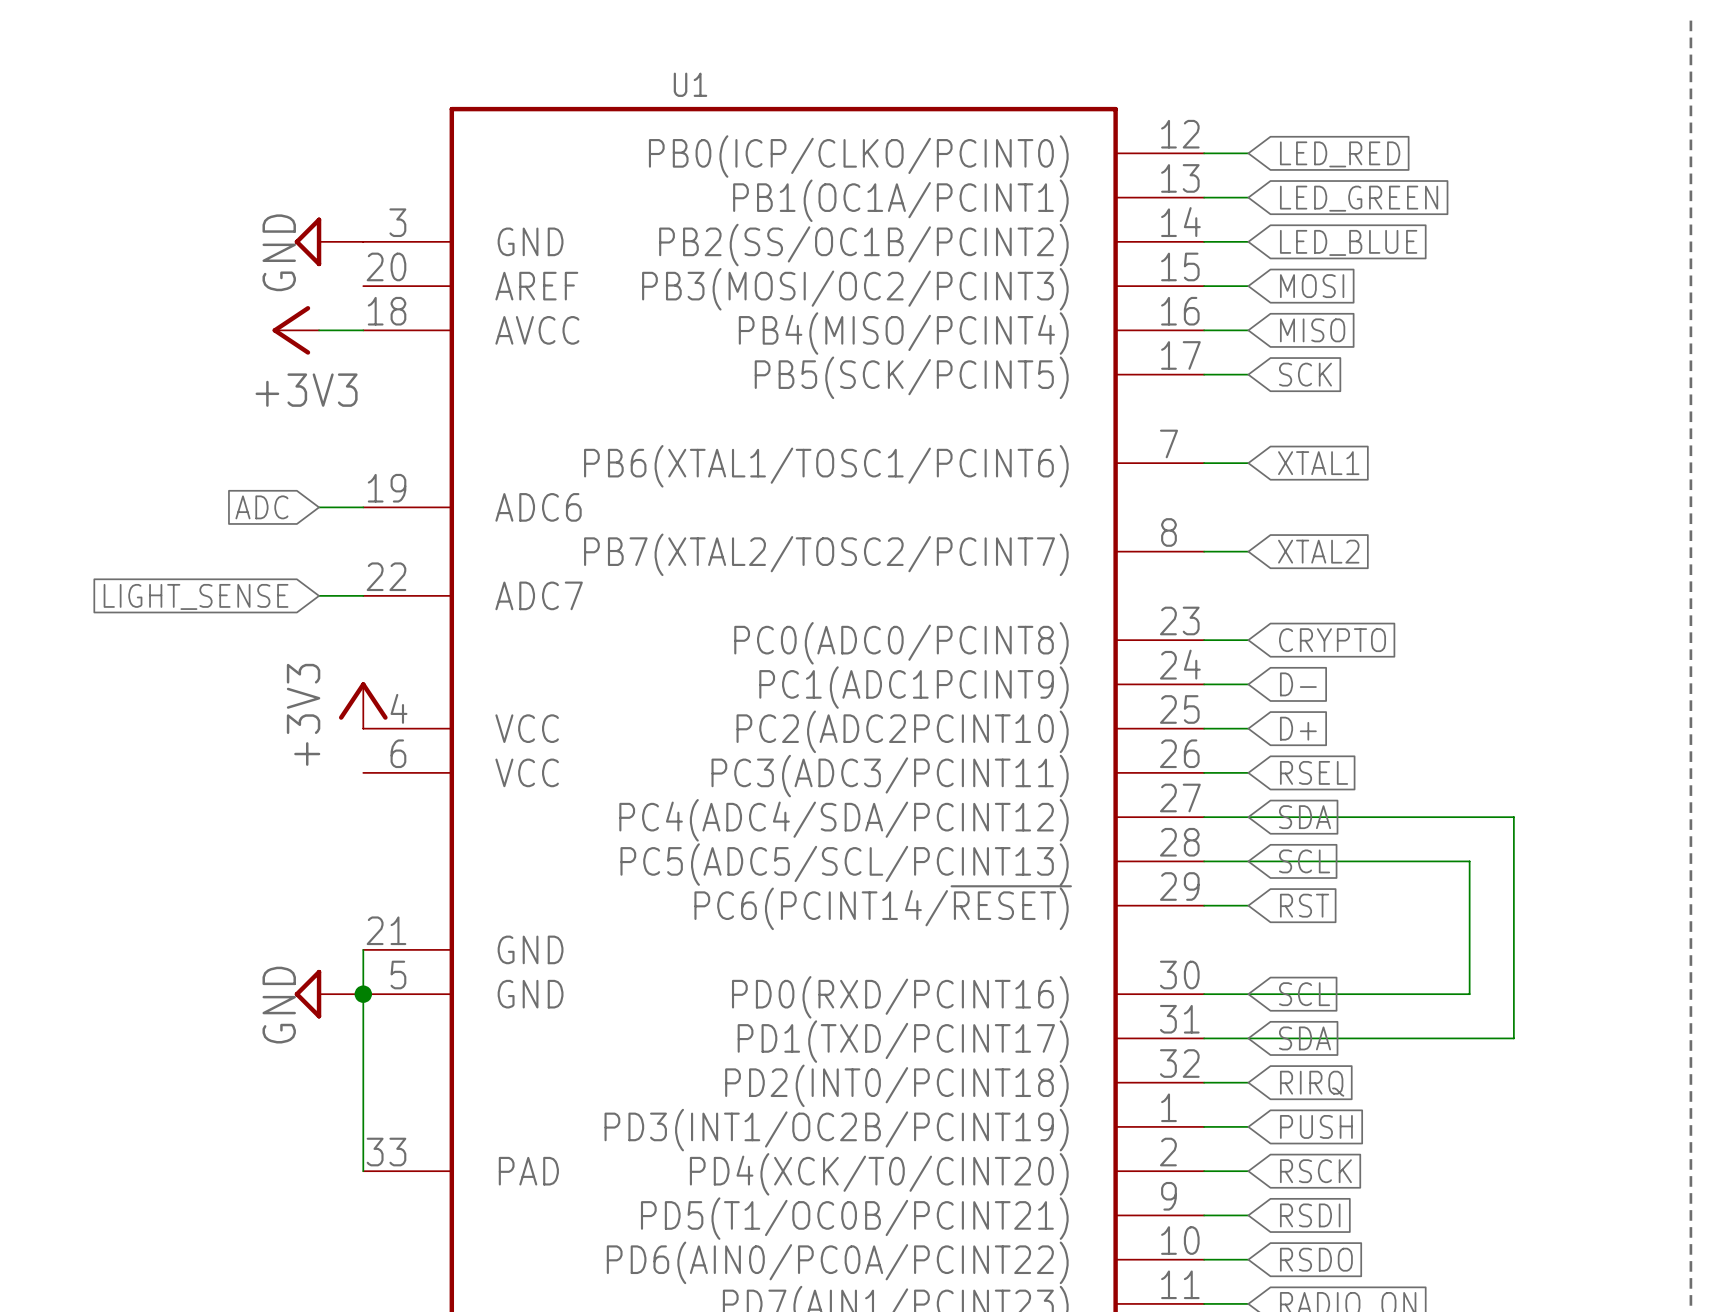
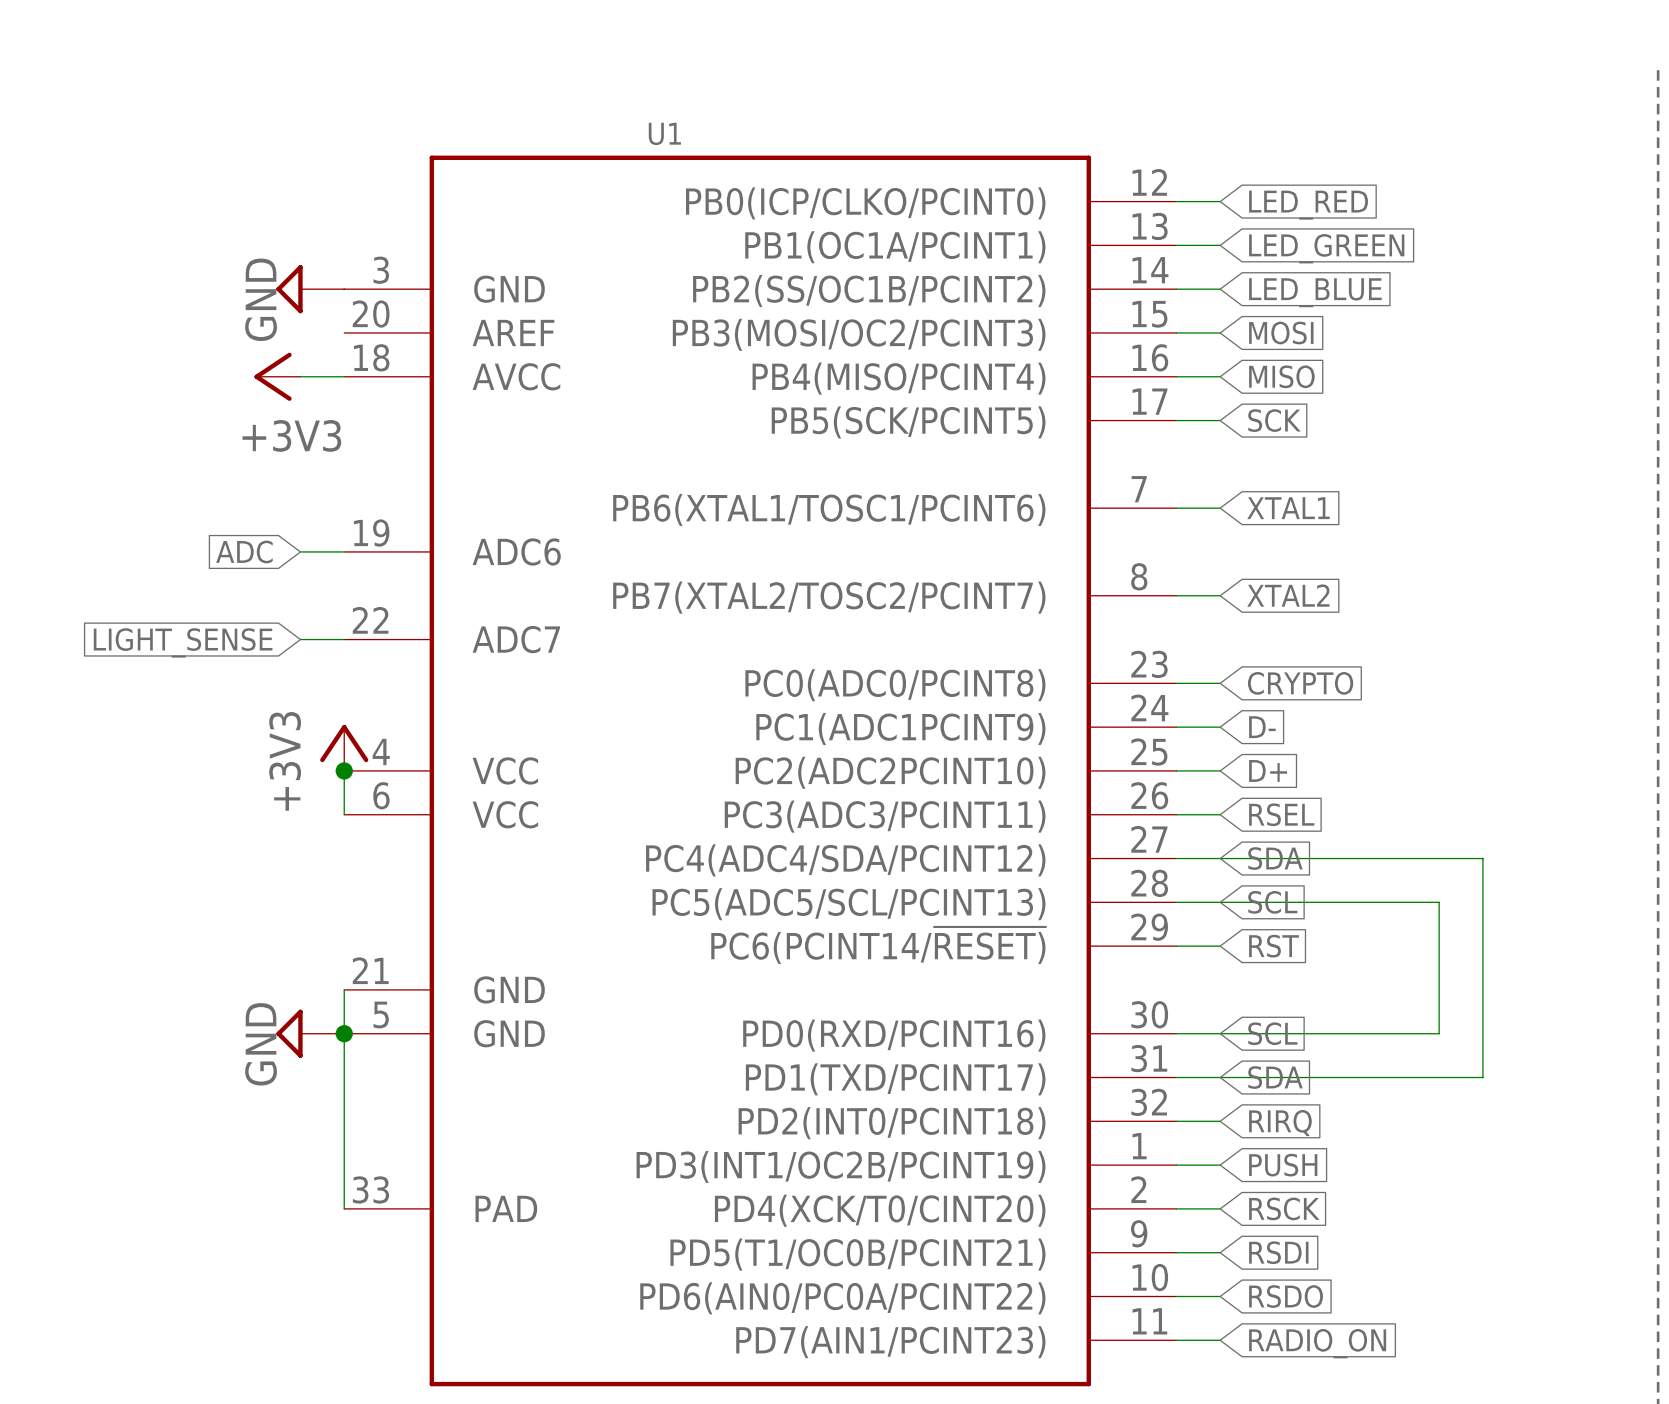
wire: none -> (344, 770) (344, 814)
junction: none -> (344, 770)

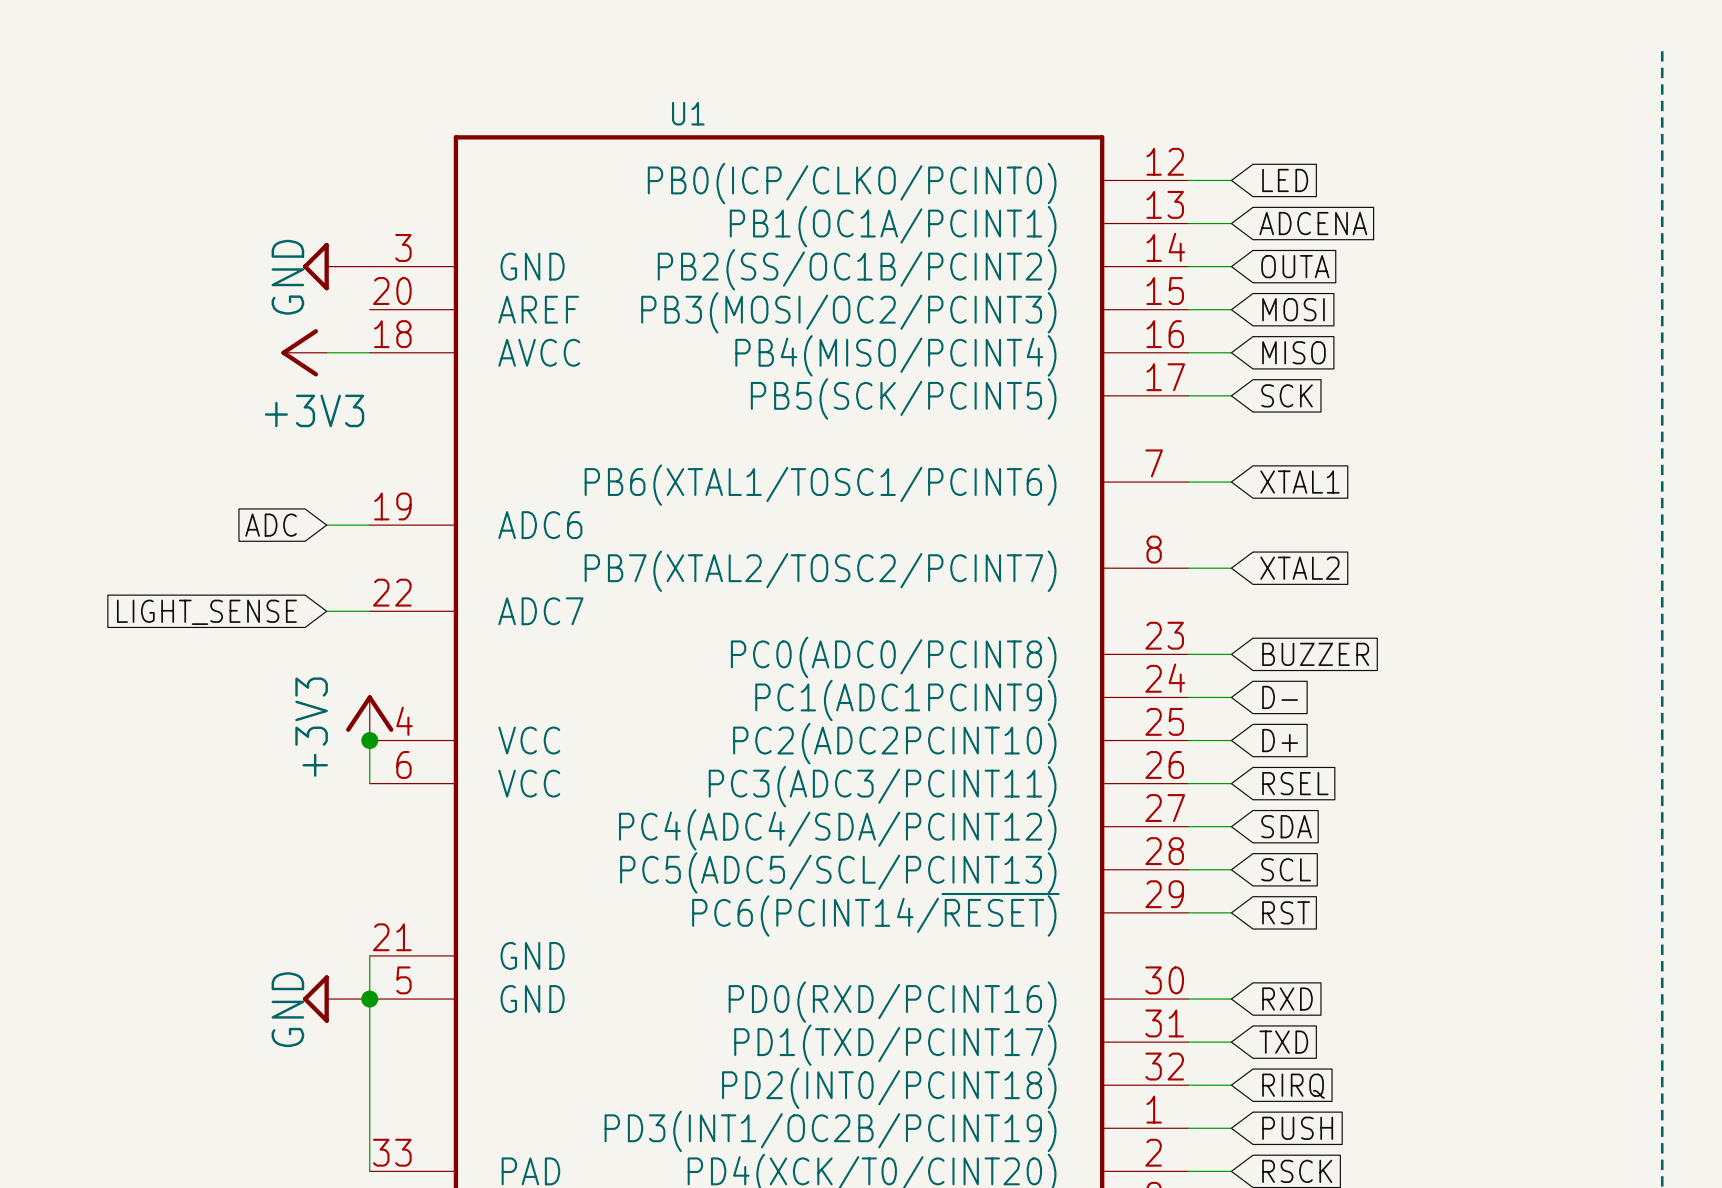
global label: LED_RED (1308, 205) -> LED (1285, 180)
global label: LED_GREEN (1326, 248) -> ADCENA (1313, 223)
global label: LED_BLUE (1315, 292) -> OUTA (1295, 266)
global label: CRYPTO (1300, 683) -> BUZZER (1315, 654)
wire: (1220, 858) (1482, 858) (1482, 1077) (1220, 1077) -> none
wire: (1220, 902) (1439, 902) (1439, 1033) (1220, 1033) -> none
global label: SCL (1272, 1033) -> RXD (1287, 999)
global label: SDA (1275, 1077) -> TXD (1283, 1042)

